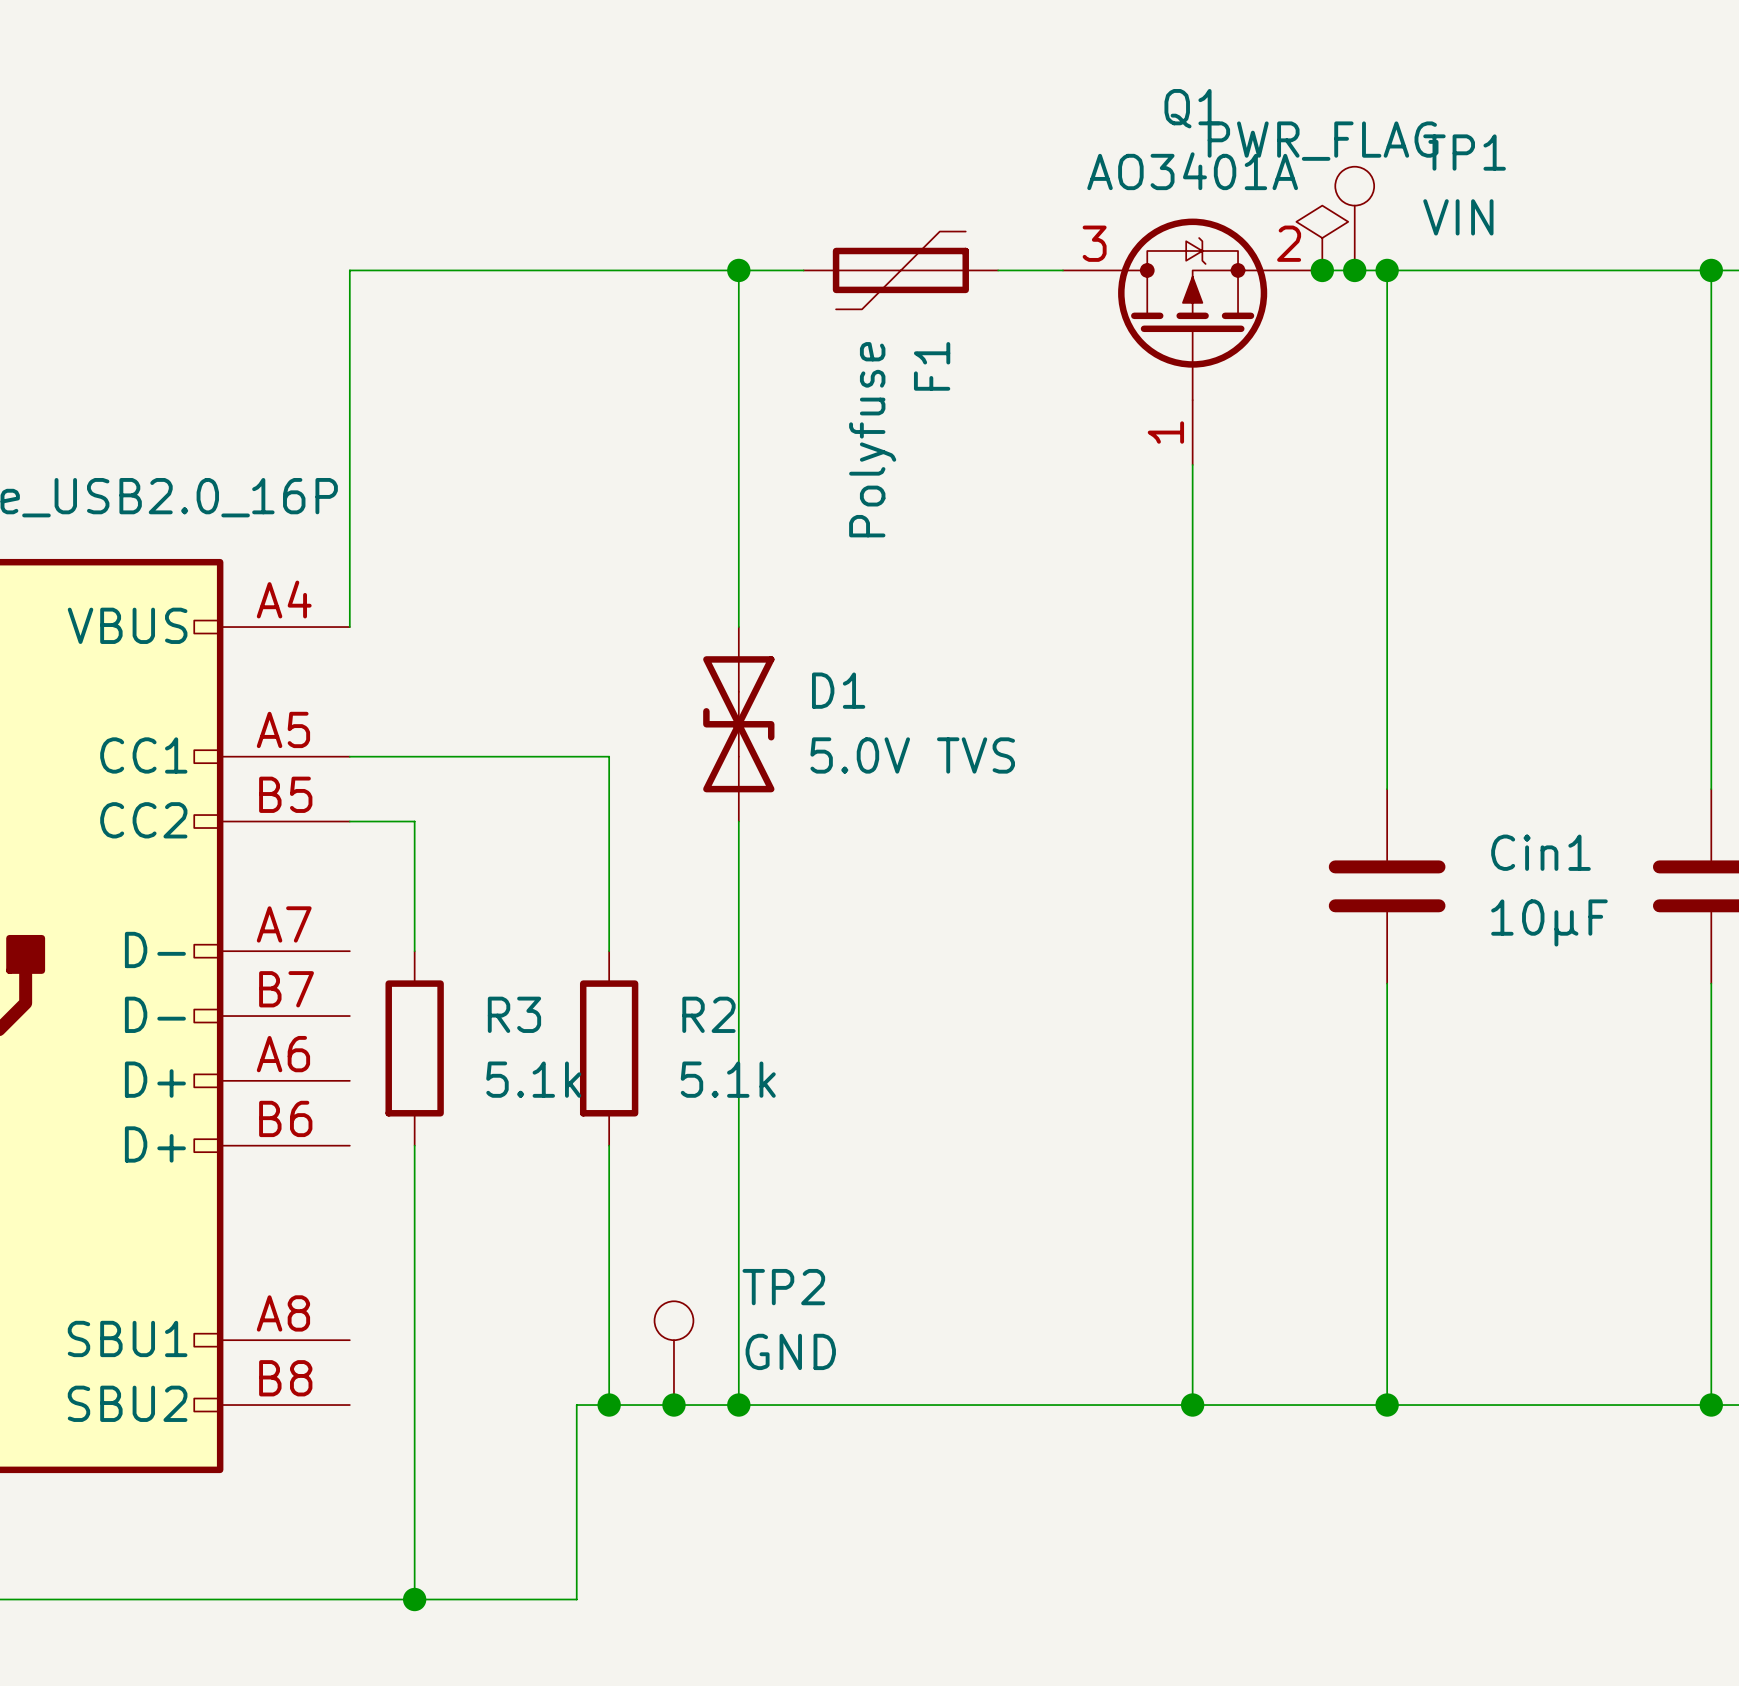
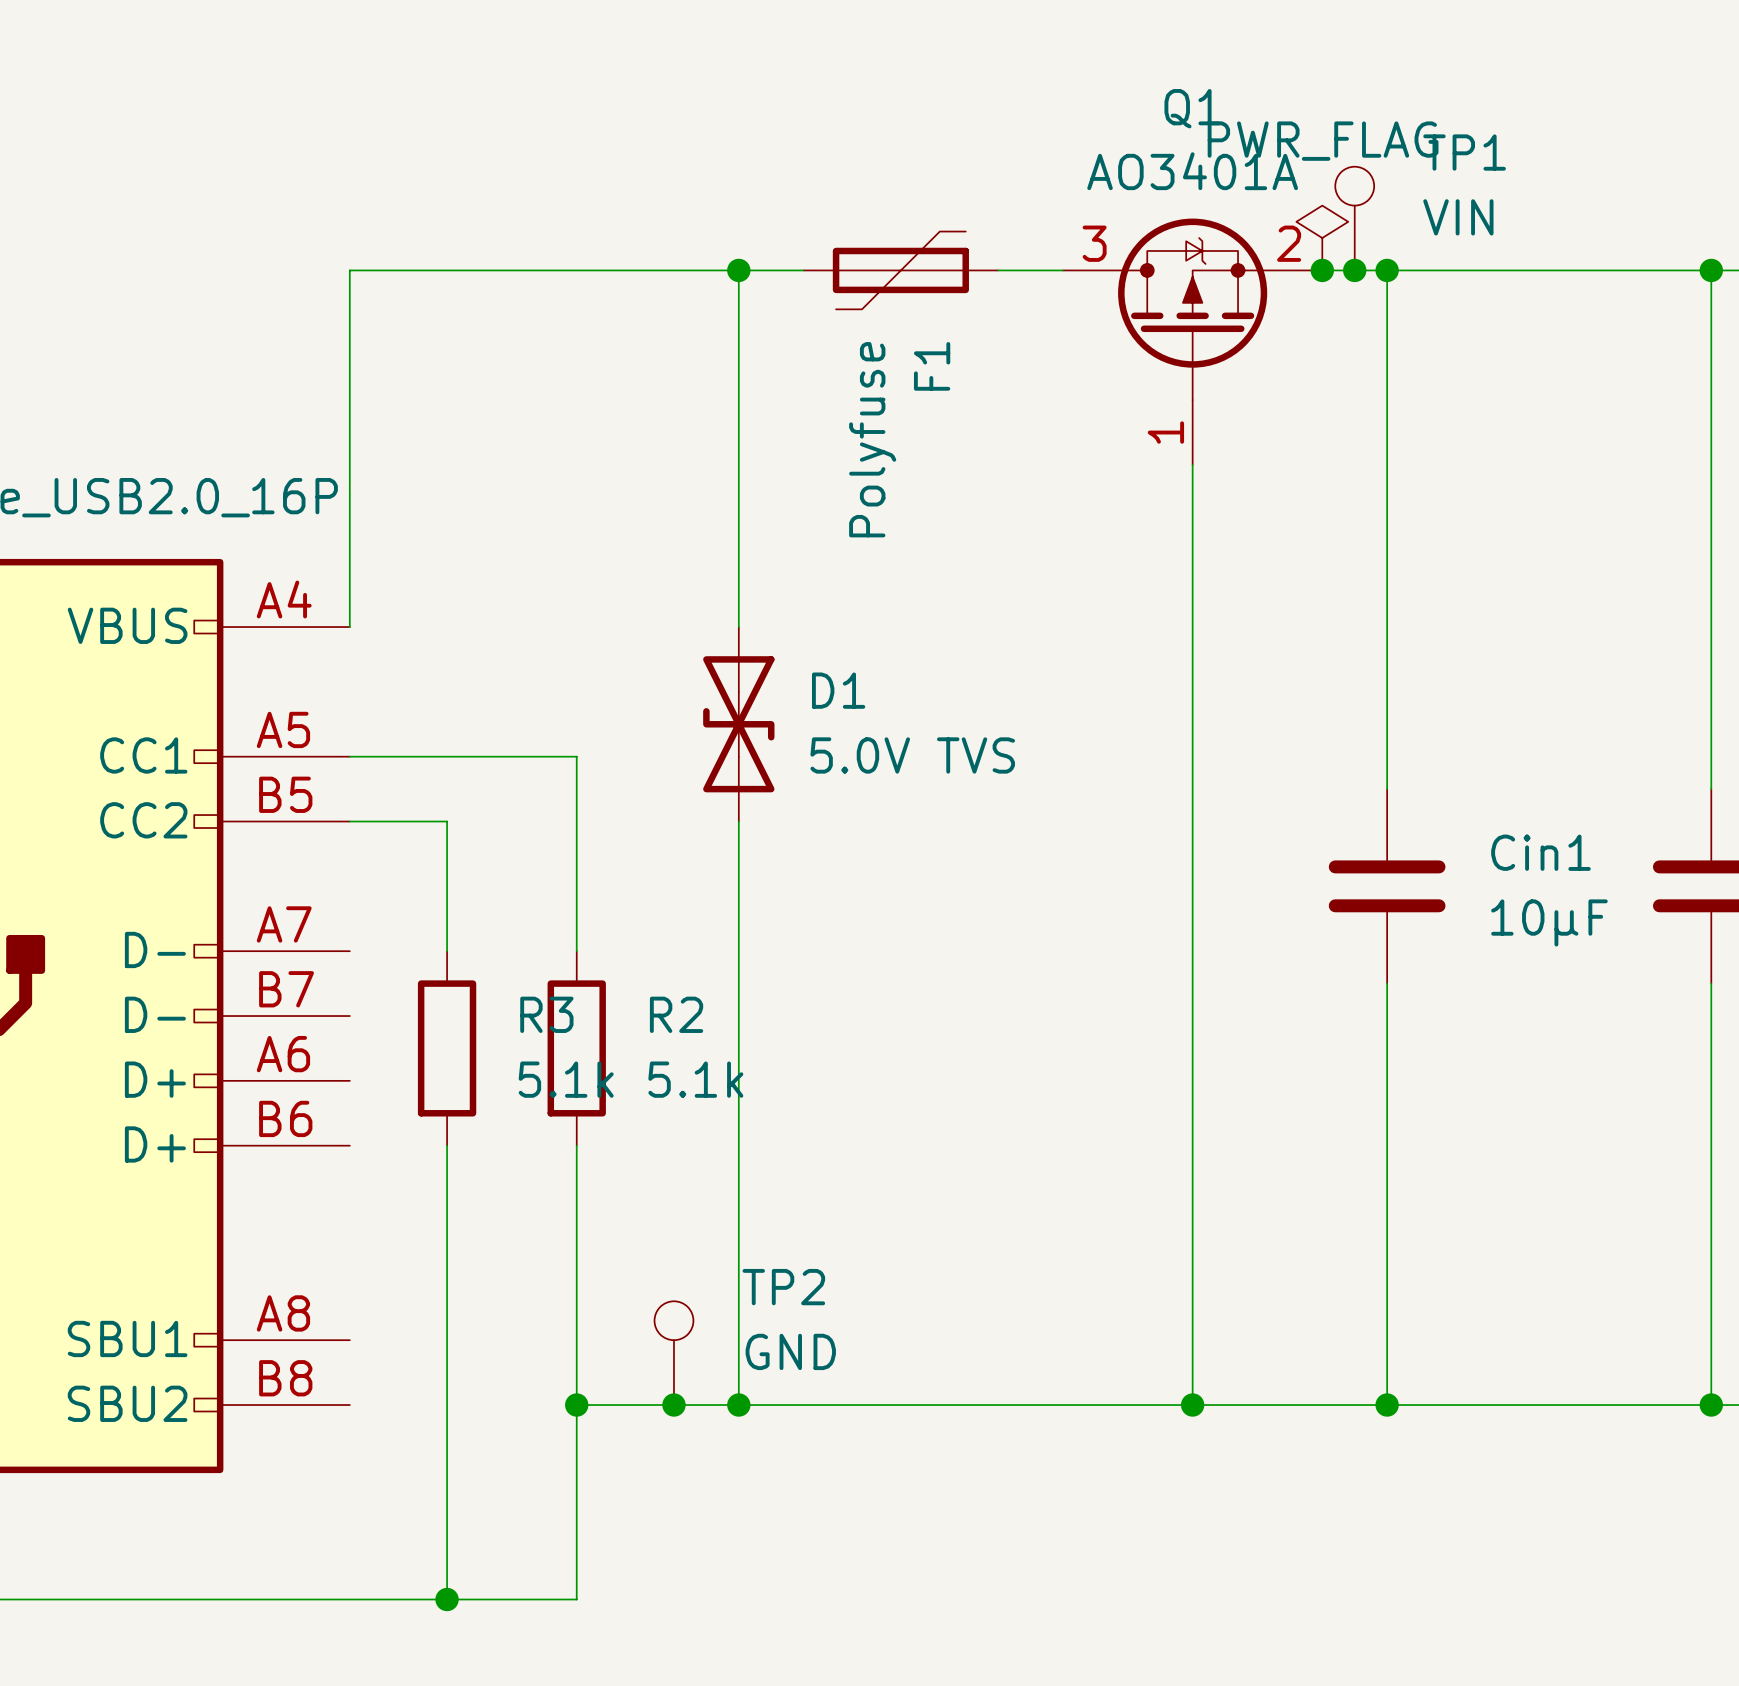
wire: (576, 756) (609, 756) (609, 951) -> (576, 756) (576, 951)
wire: (414, 821) (414, 951) -> (414, 821) (447, 821) (447, 951)
R3 position: (414, 1048) -> (447, 1048)
R2 position: (609, 1048) -> (576, 1048)
wire: (414, 1145) (414, 1599) -> (447, 1145) (447, 1599)
wire: (609, 1145) (609, 1405) -> (576, 1145) (576, 1405)
junction position: (609, 1405) -> (576, 1405)
junction position: (414, 1599) -> (447, 1599)

